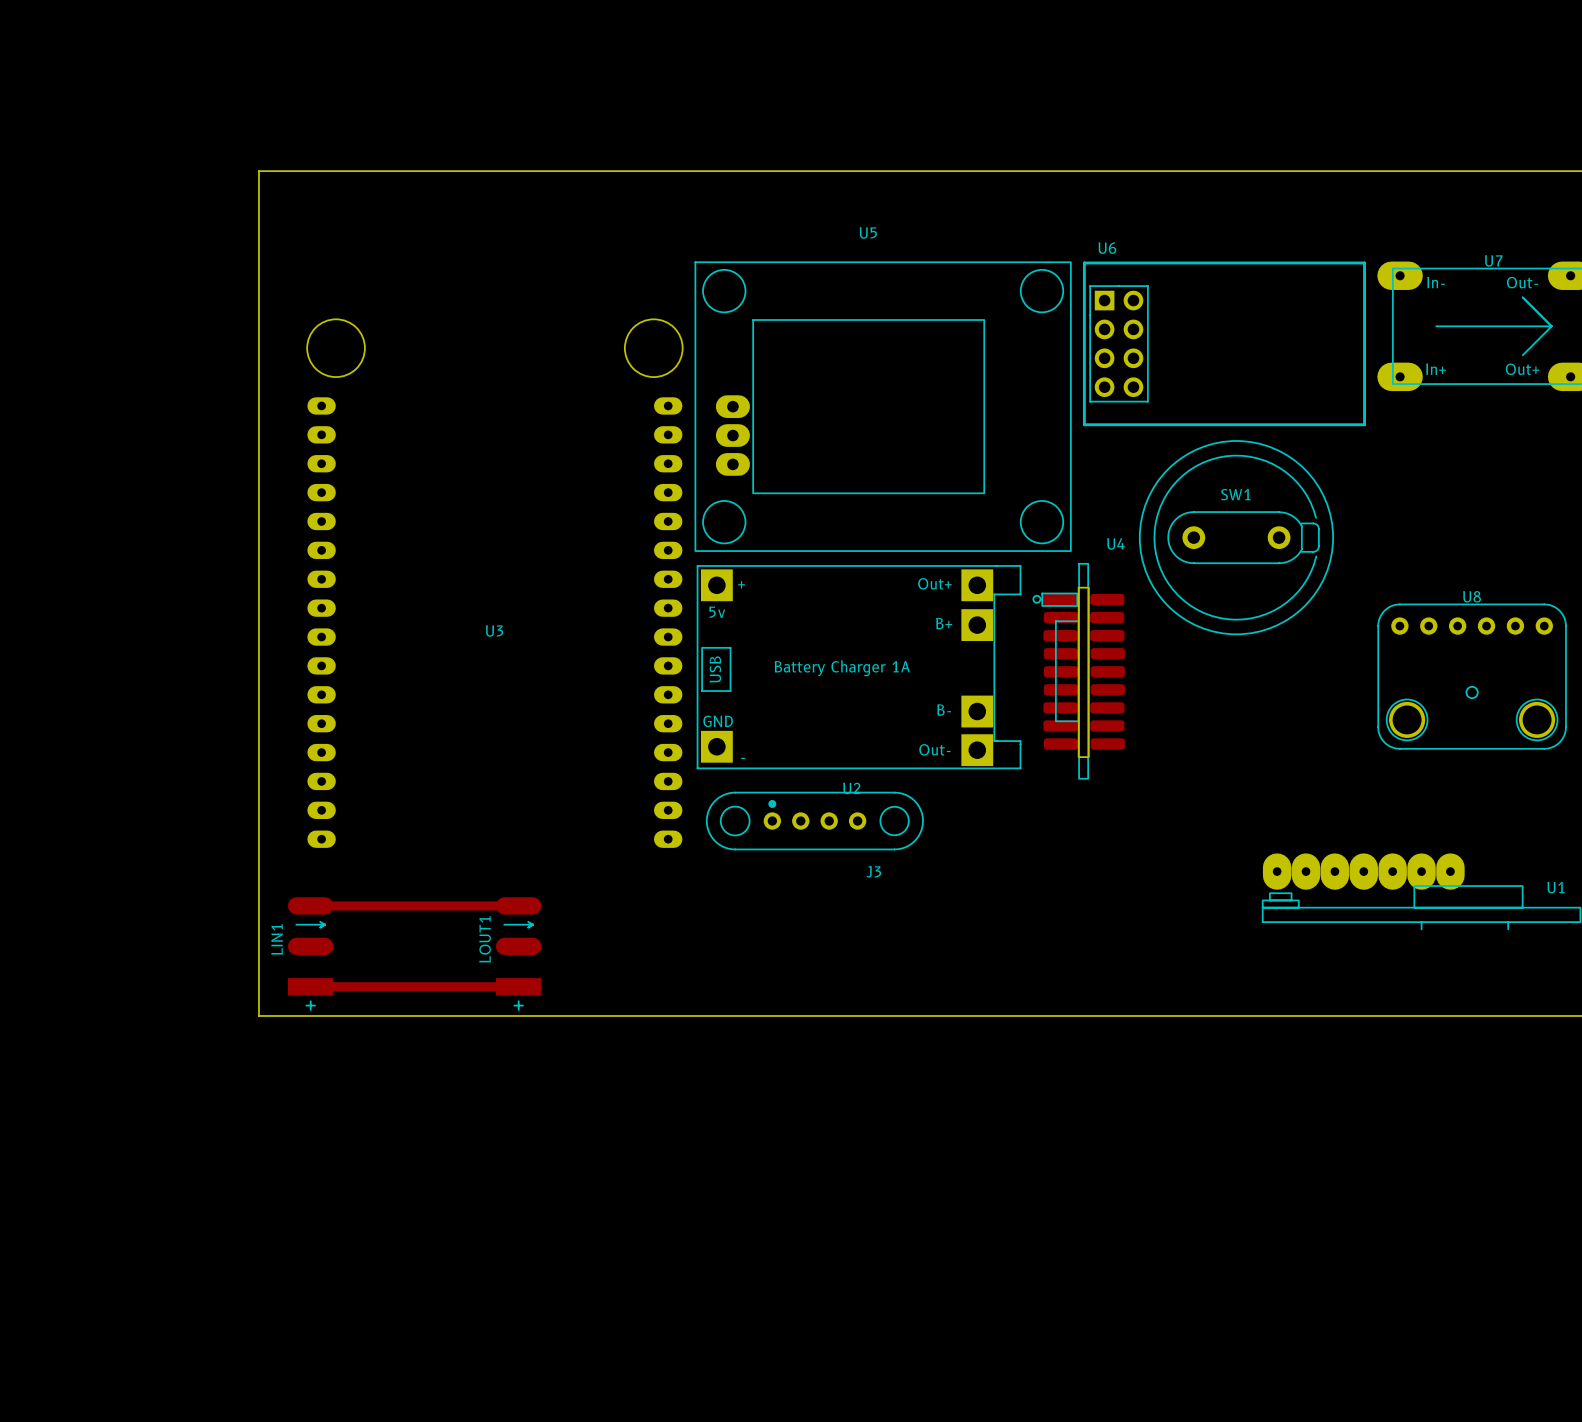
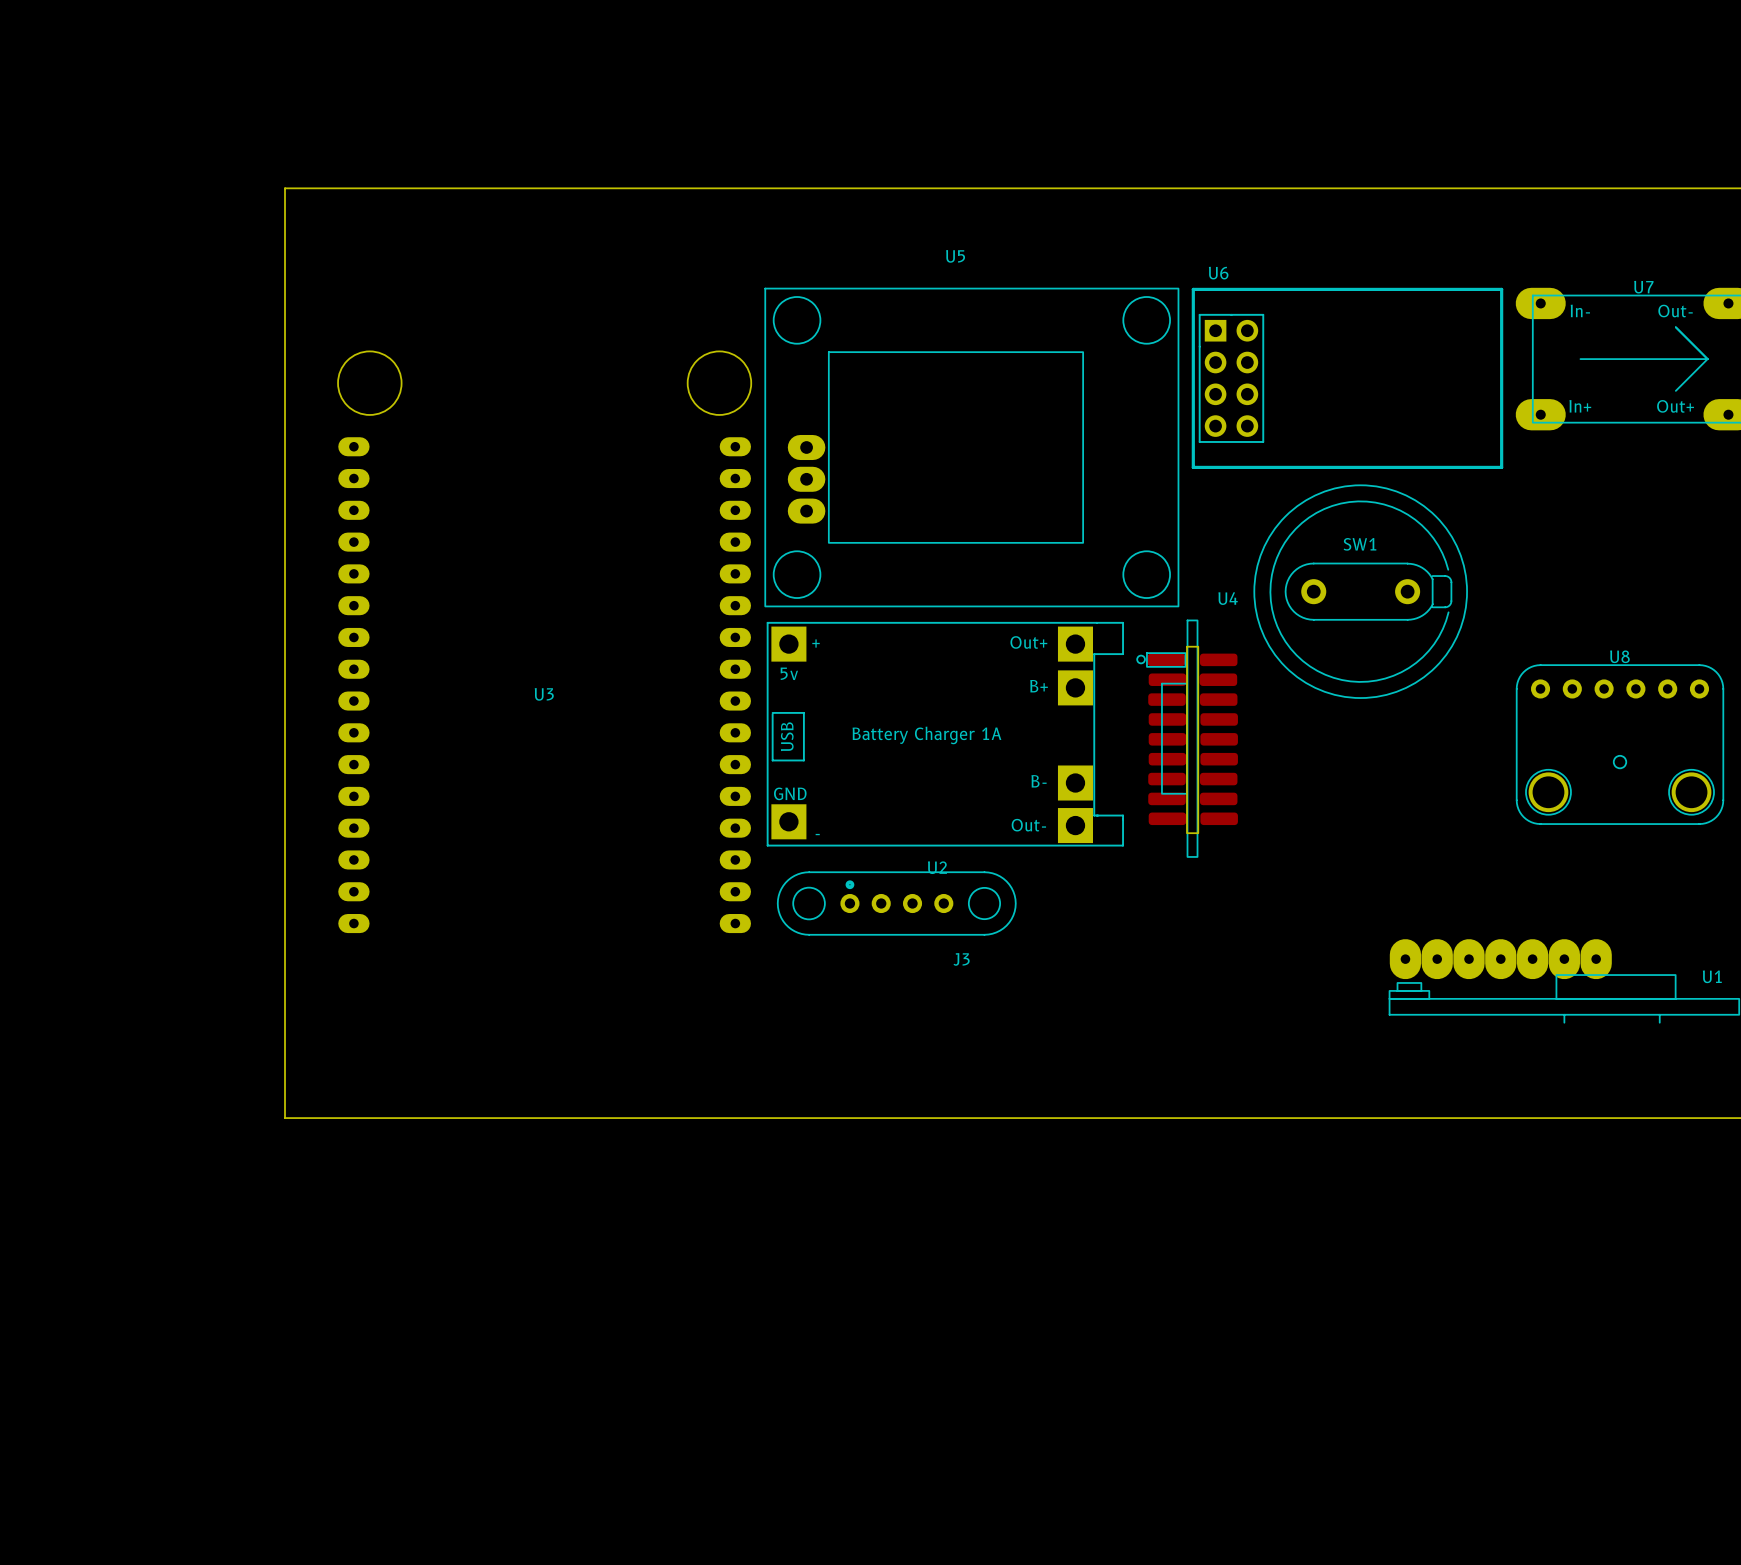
top track: (310, 905) (518, 905) -> none
LIN1: (310, 953) -> none
LOUT1: (518, 953) -> none
top track: (310, 986) (518, 986) -> none

